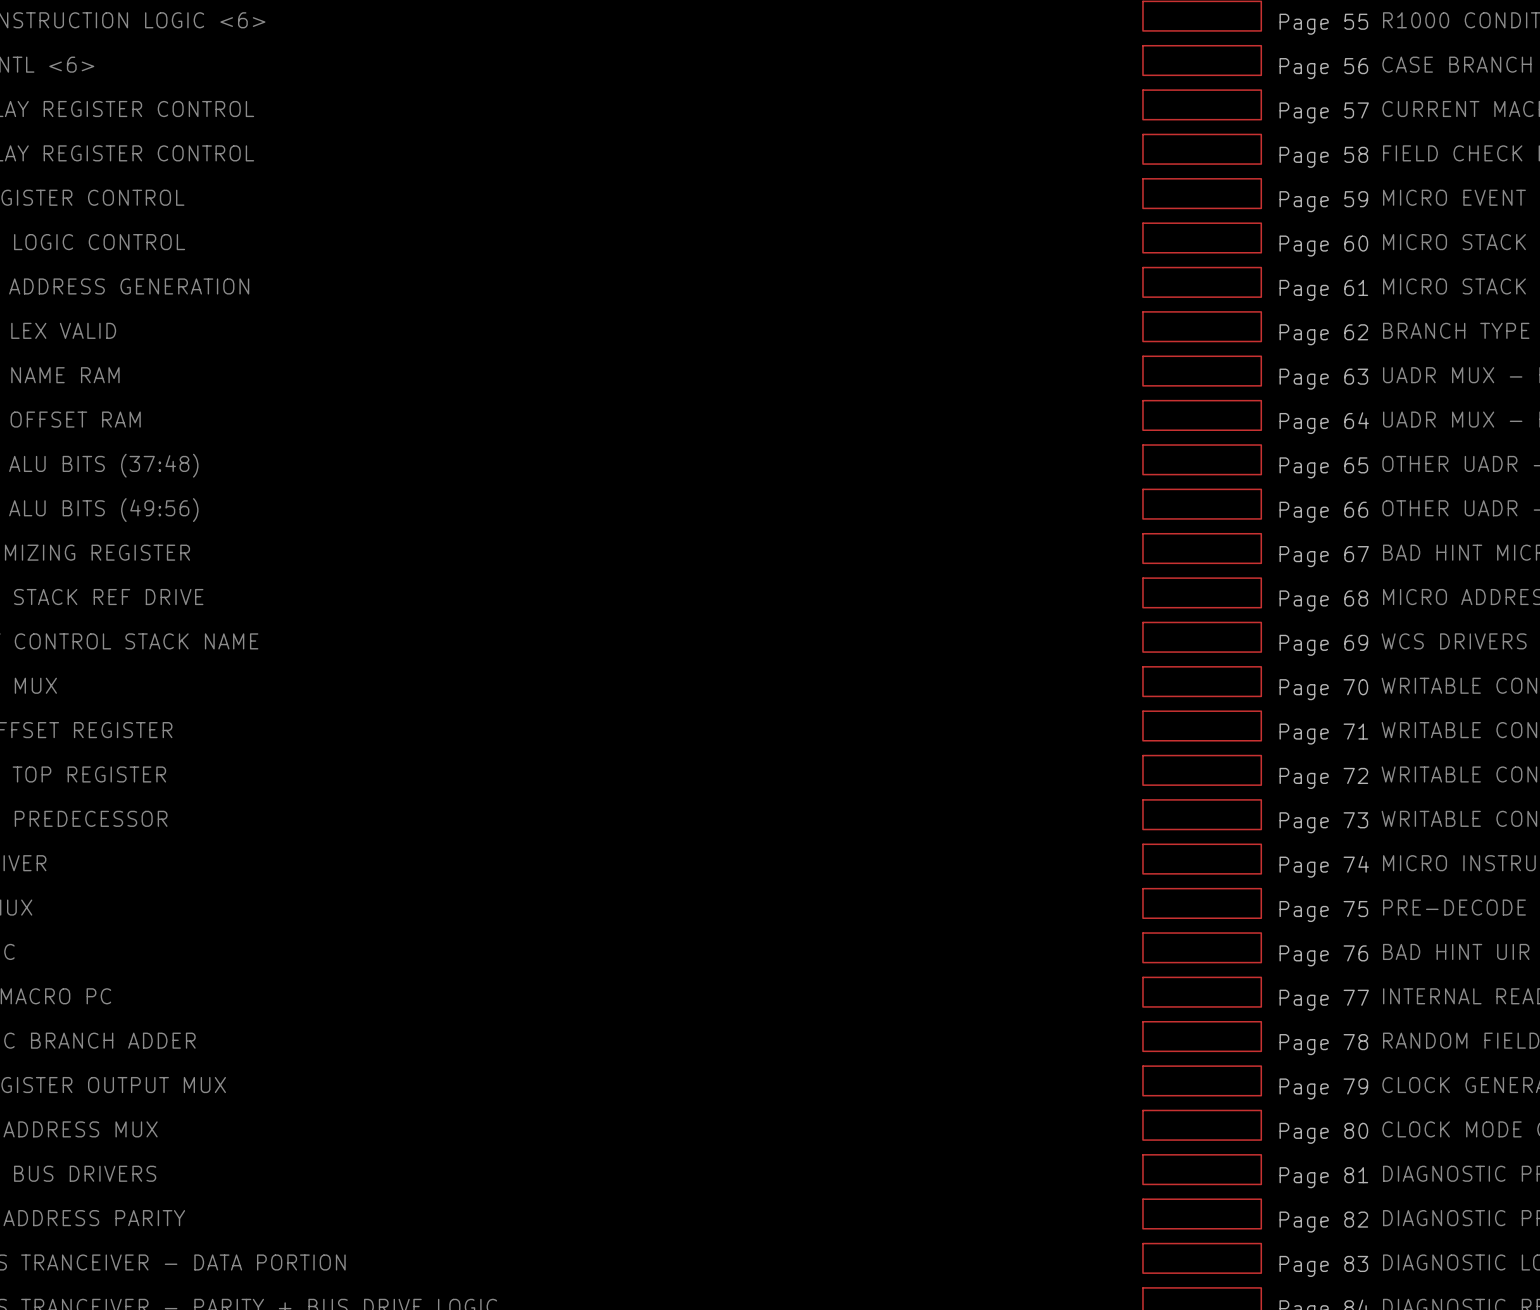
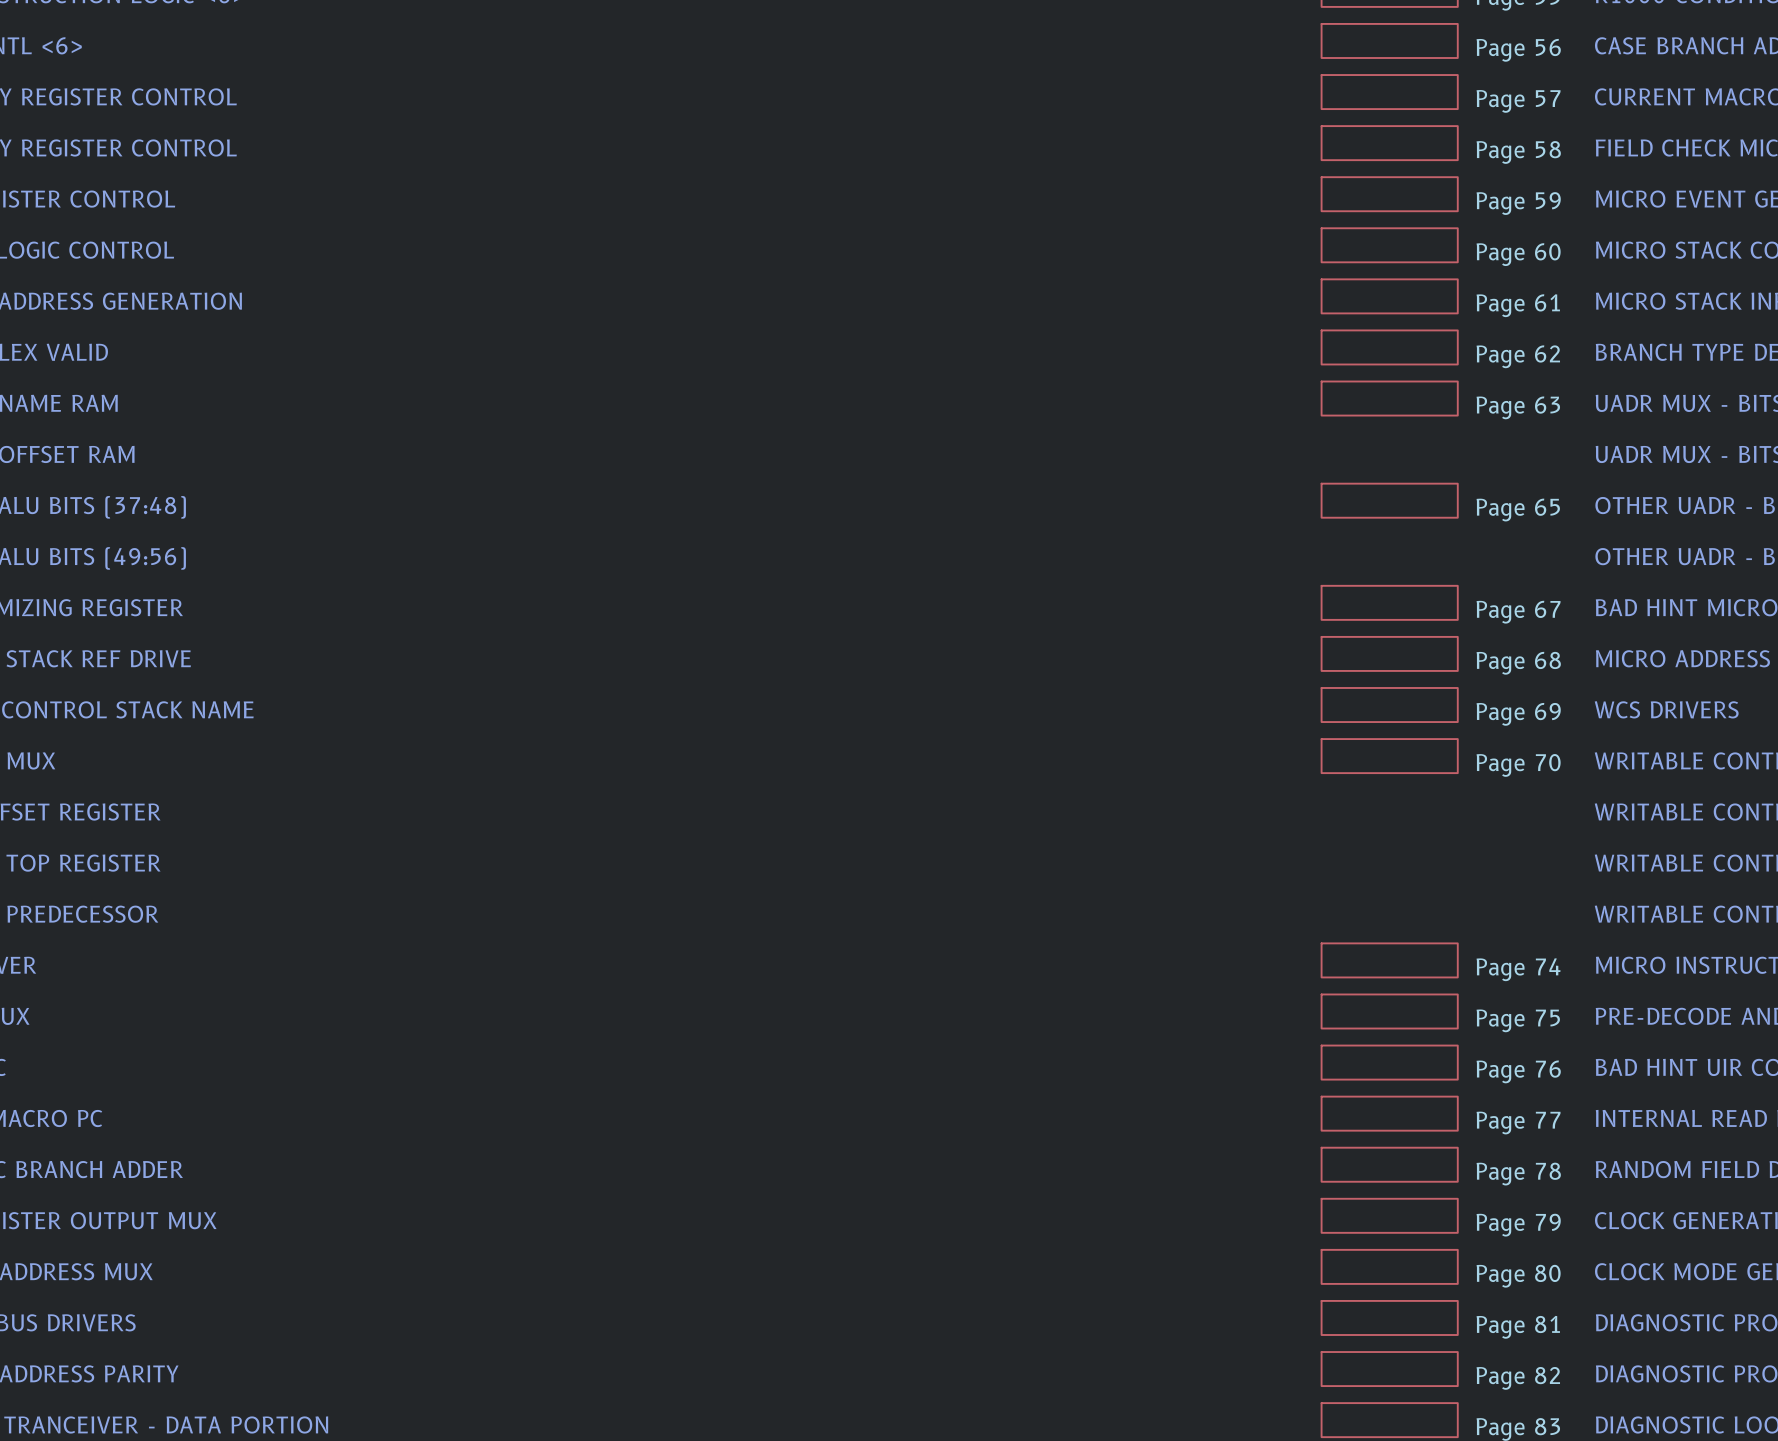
sheet Page 64: (1202, 415) -> none
sheet Page 66: (1202, 504) -> none
sheet Page 71: (1202, 725) -> none
sheet Page 72: (1202, 770) -> none
sheet Page 73: (1202, 814) -> none

